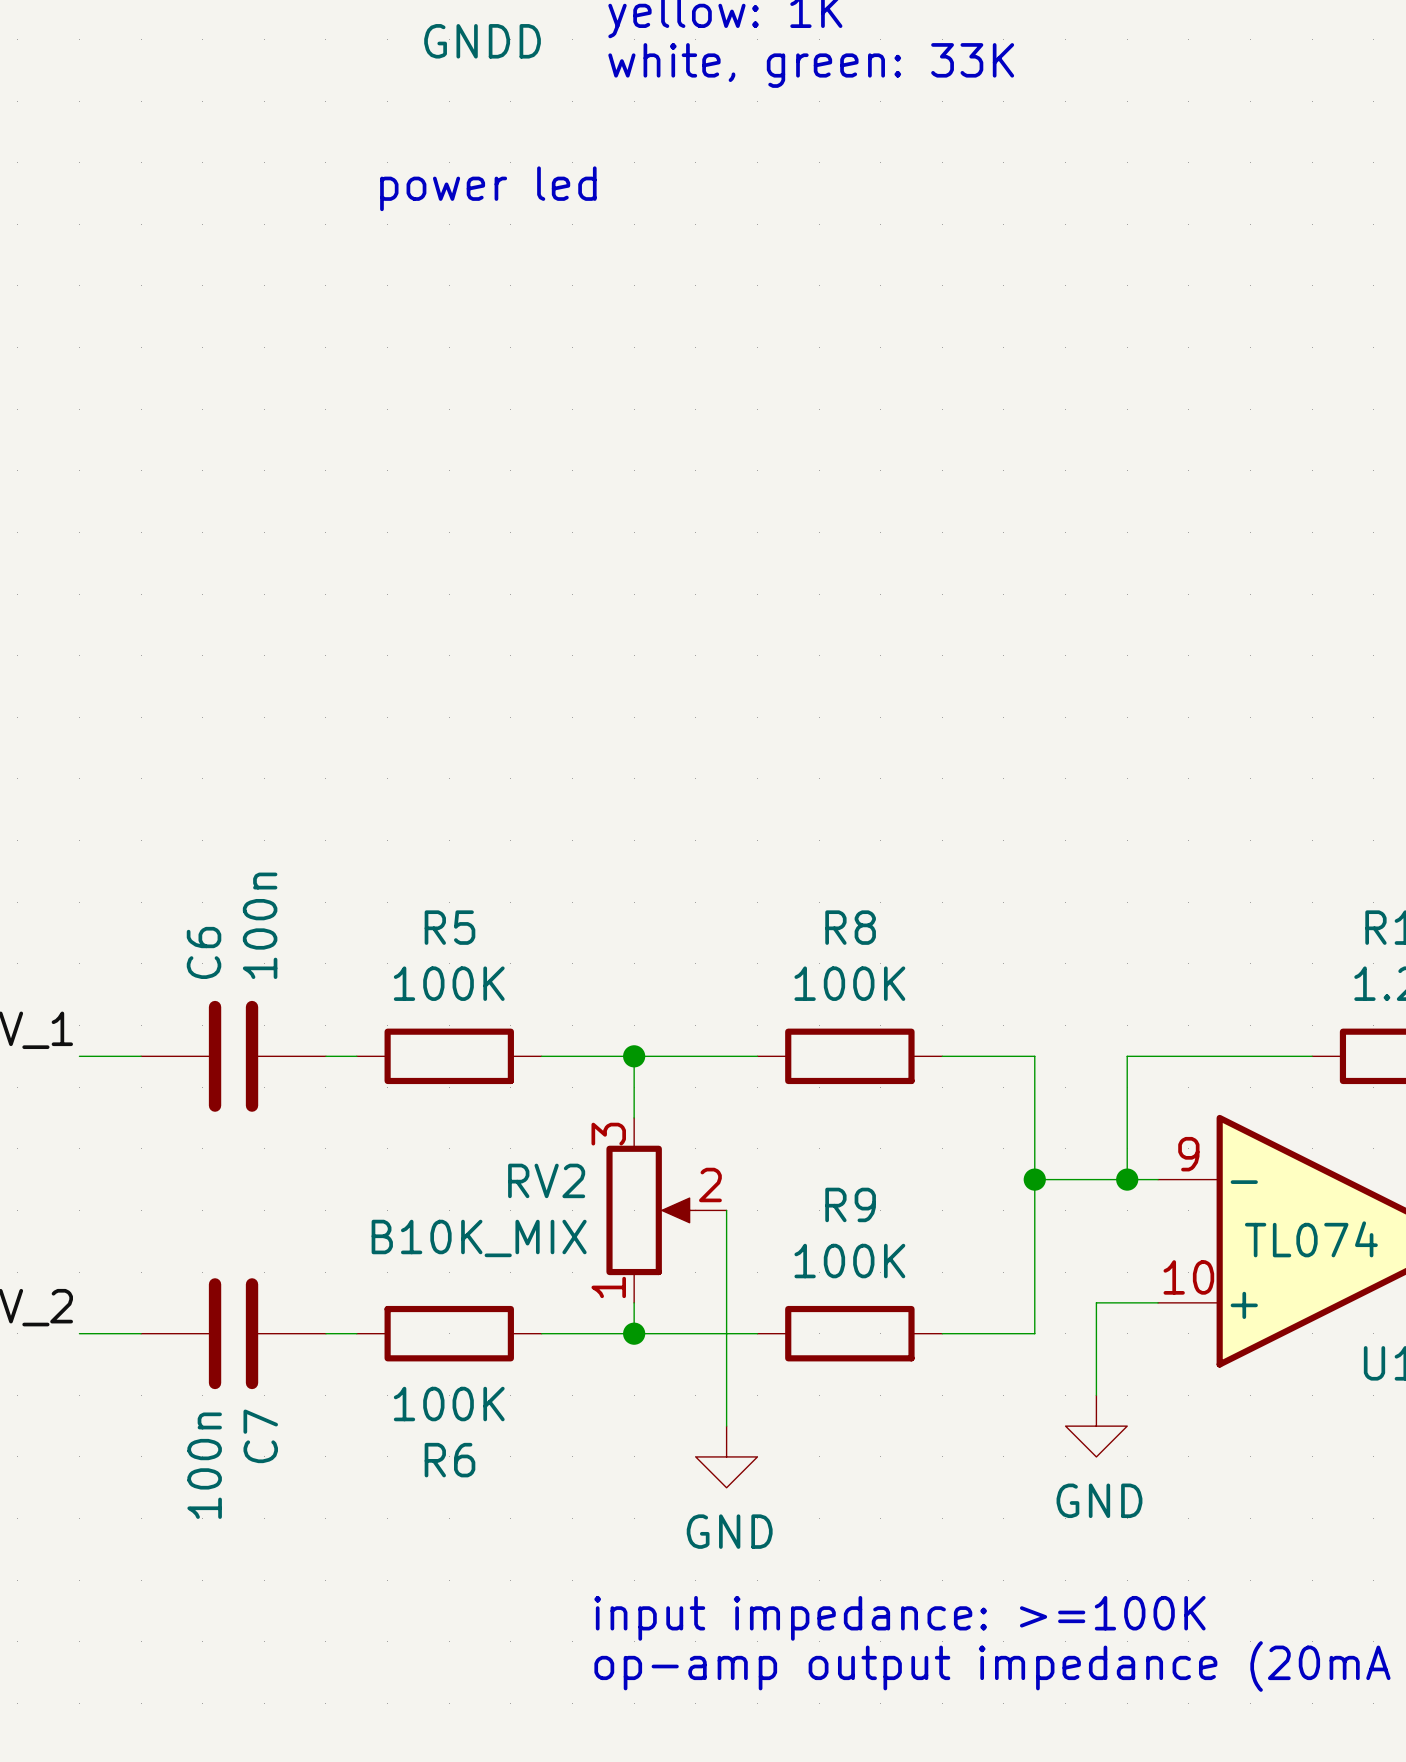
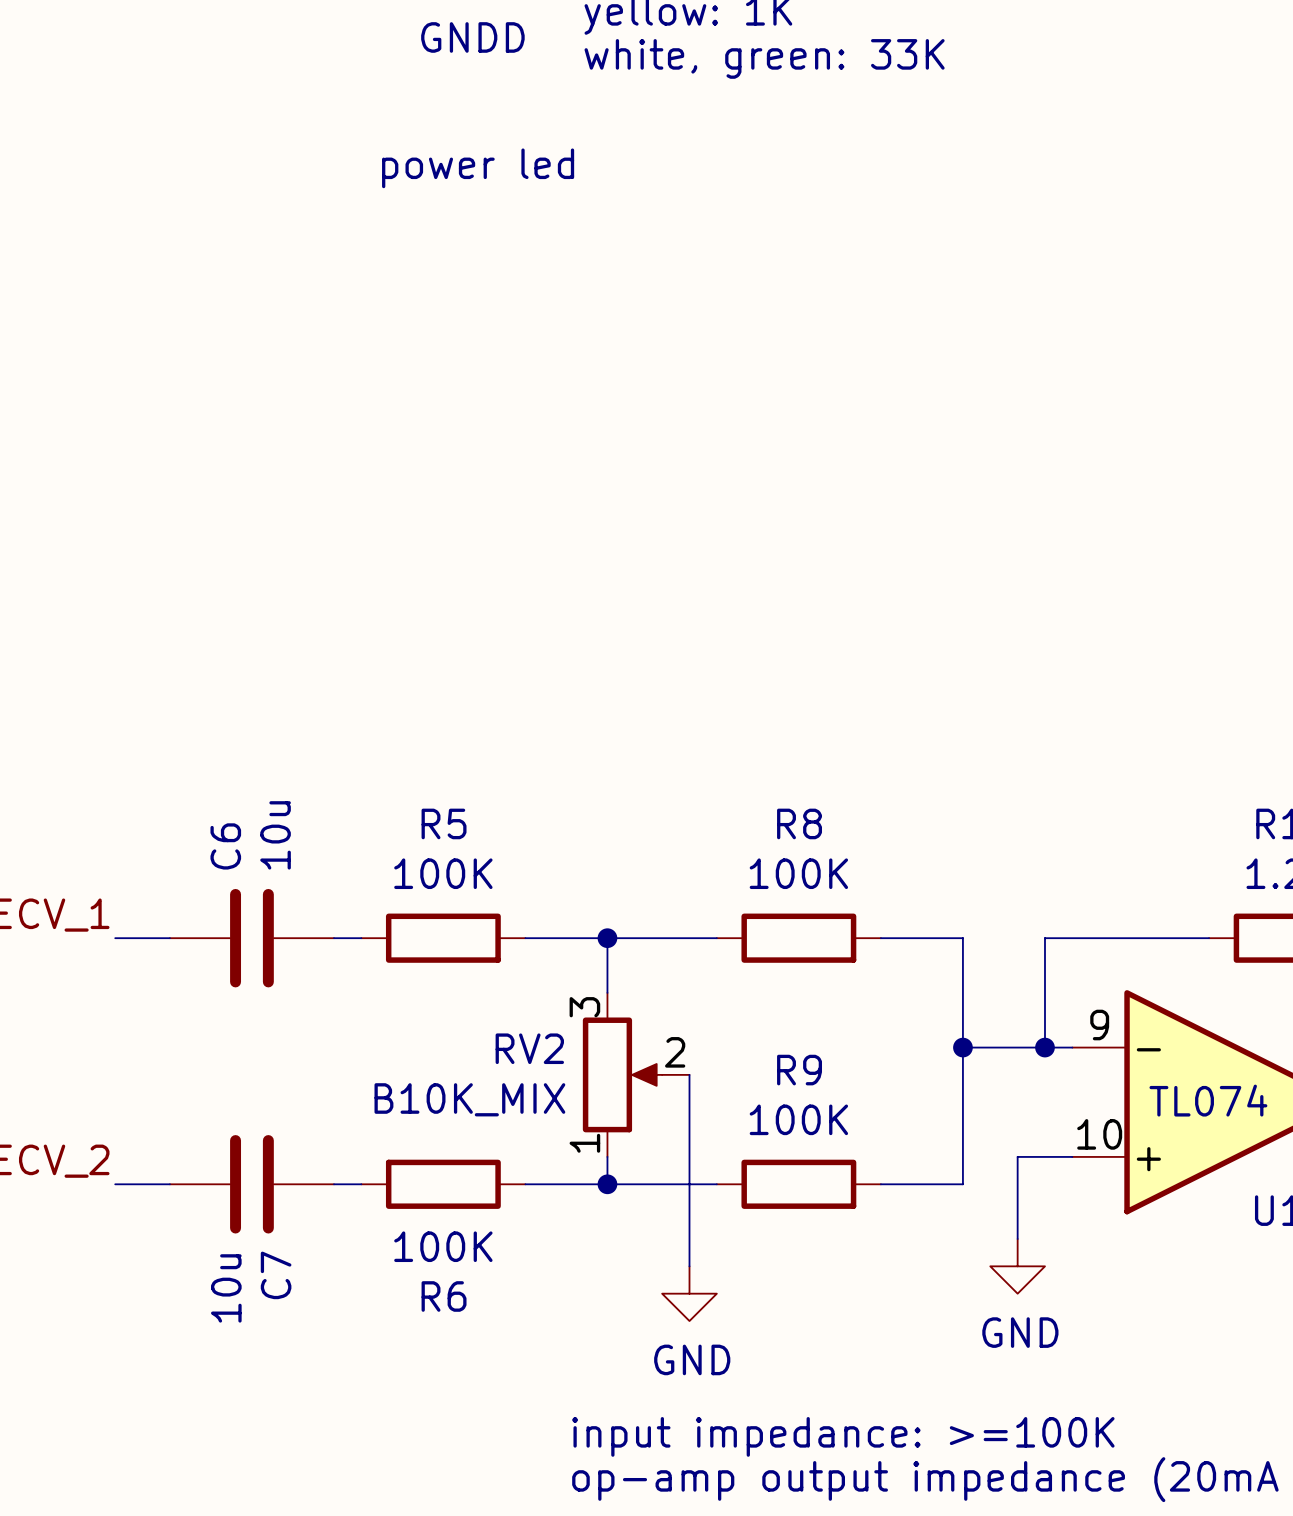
C6 value: 100n (260, 925) -> 10u (275, 835)
C7 value: 100n (204, 1465) -> 10u (226, 1288)

